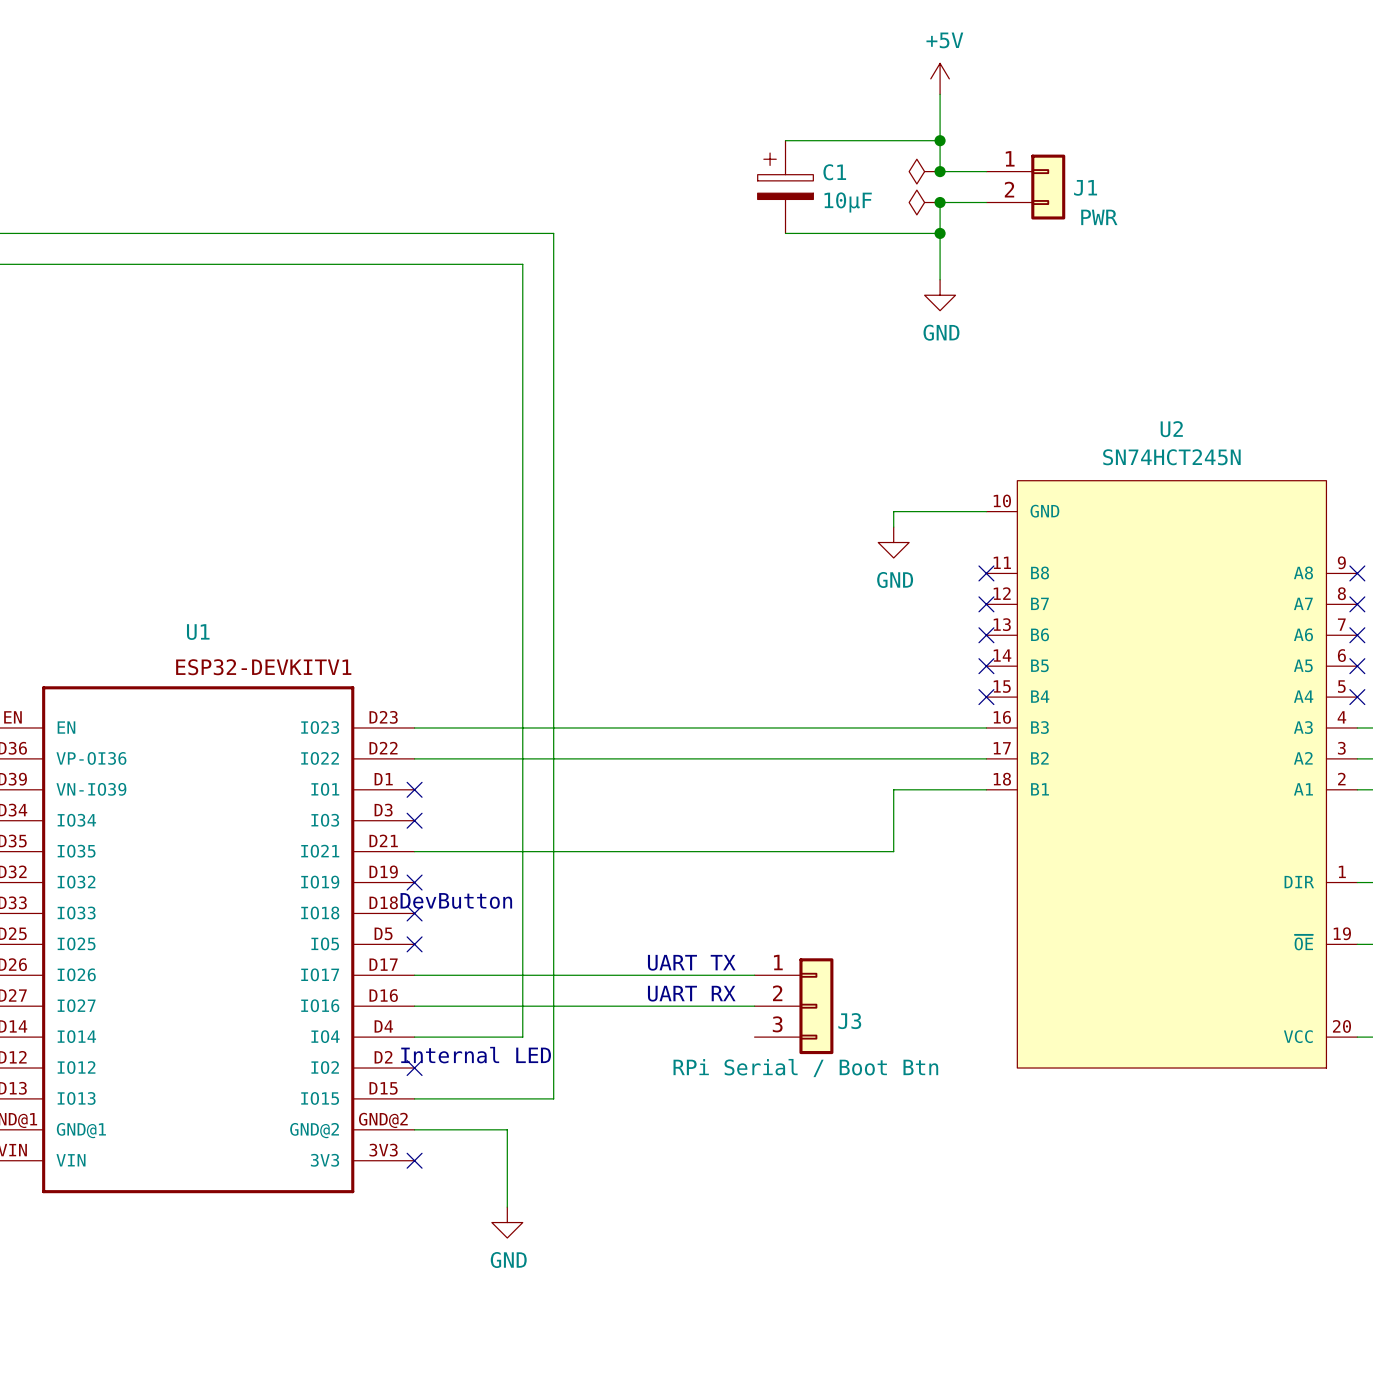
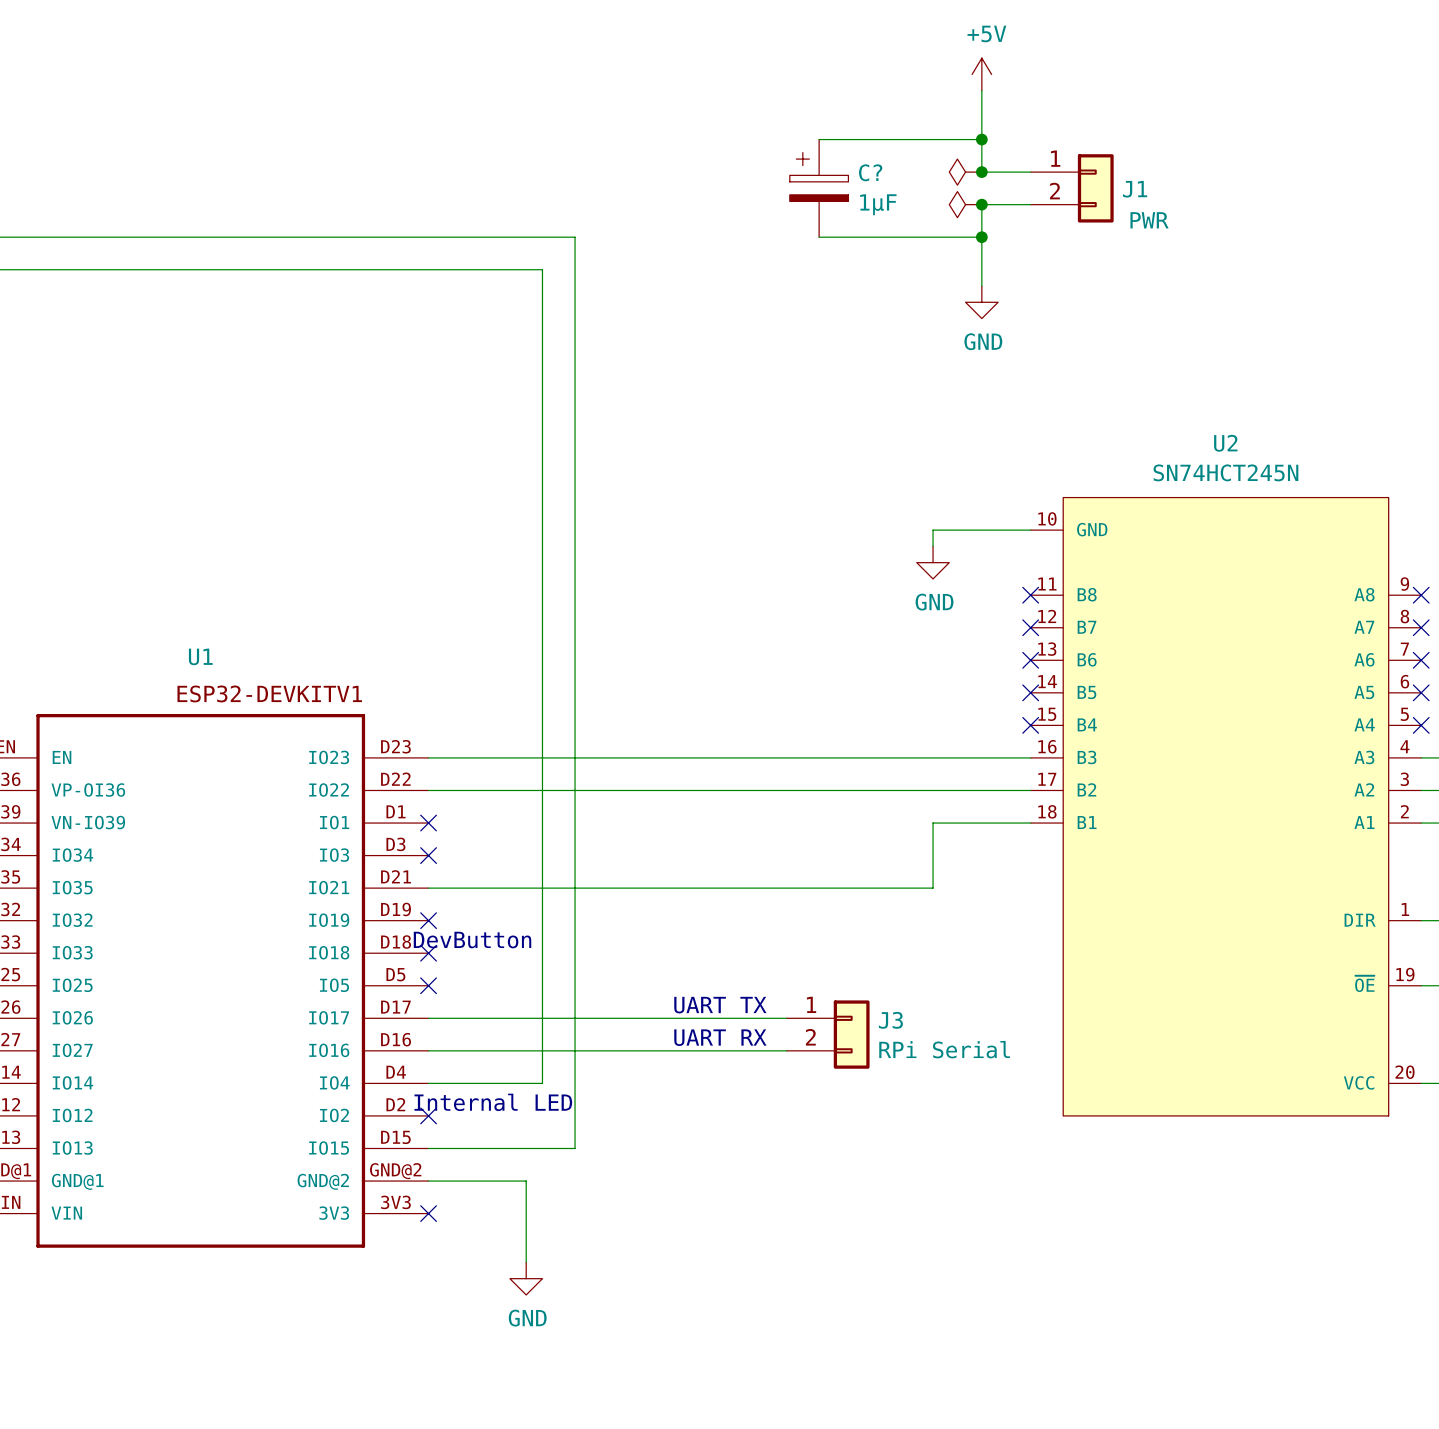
C1 name: C1 (834, 172) -> C? (870, 172)
C1 value: 10µF (848, 202) -> 1µF (878, 204)
J3 symbol: [754, 958, 834, 1055] -> [786, 1000, 870, 1069]
J3 name position: J3 (849, 1021) -> J3 (890, 1020)
J3 value: RPi Serial / Boot Btn (805, 1068) -> RPi Serial (944, 1049)

